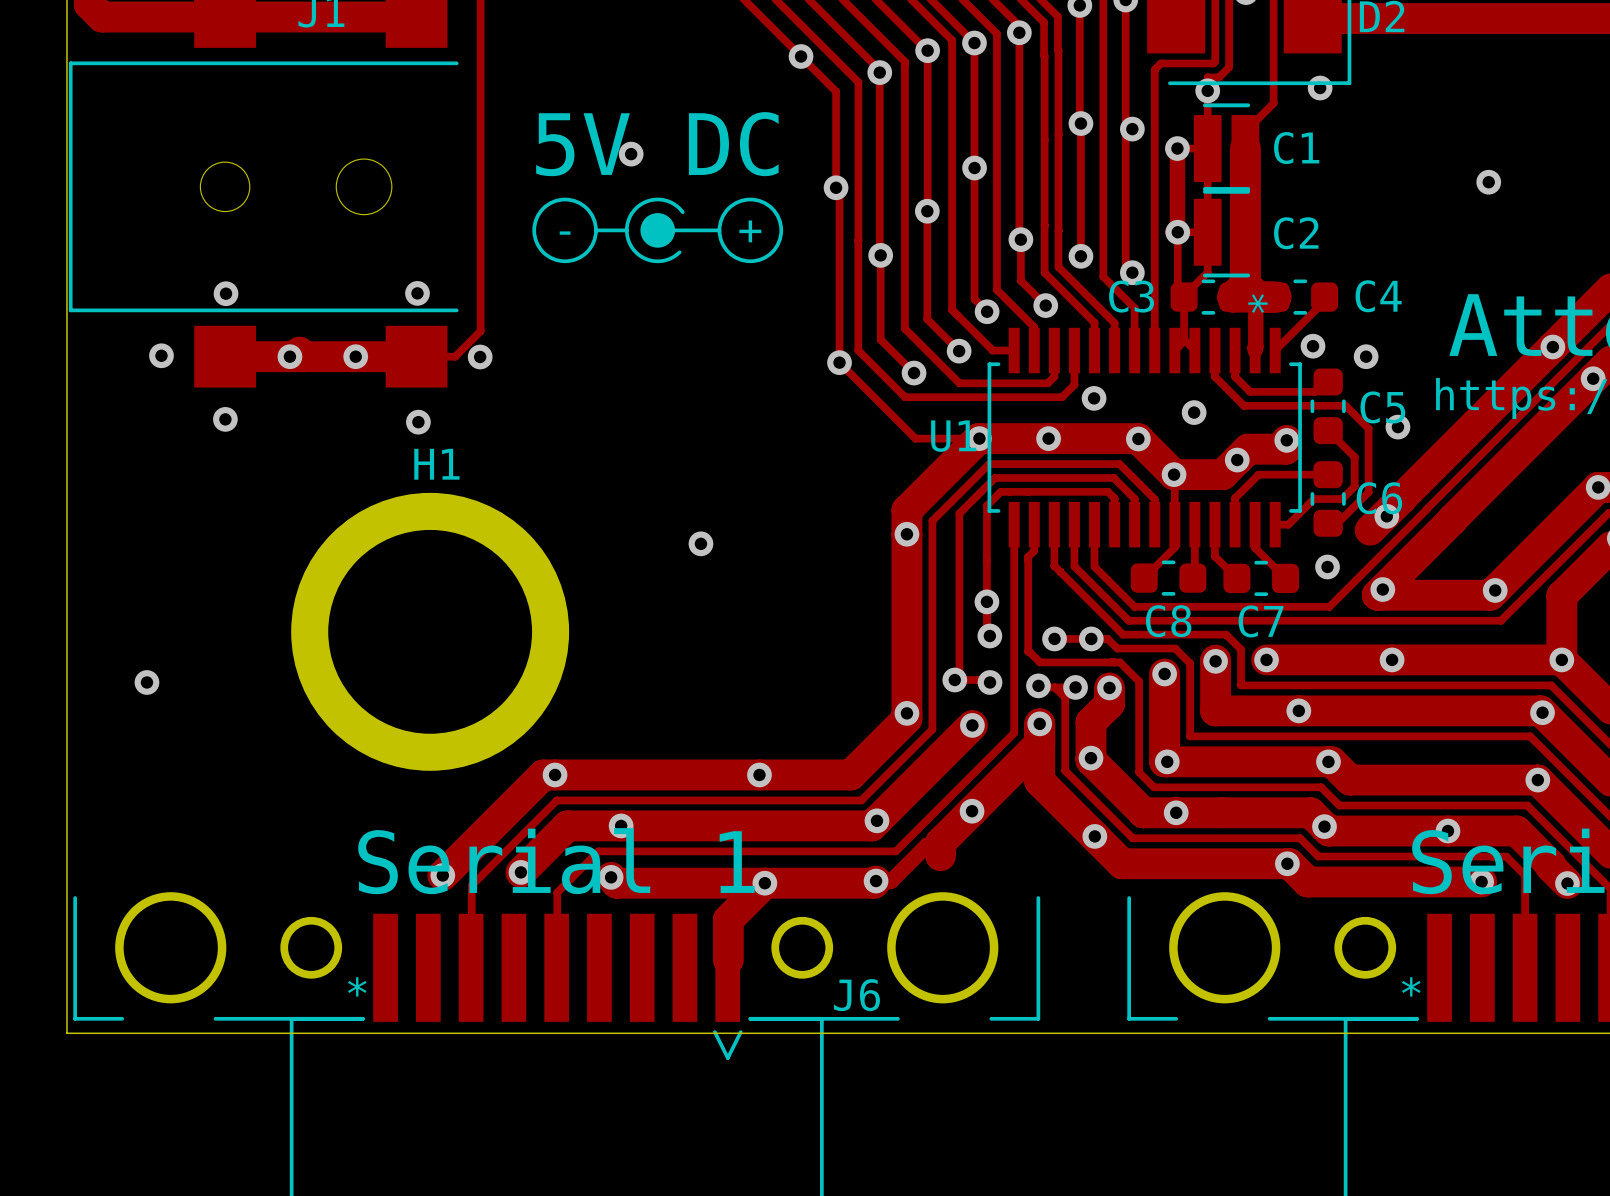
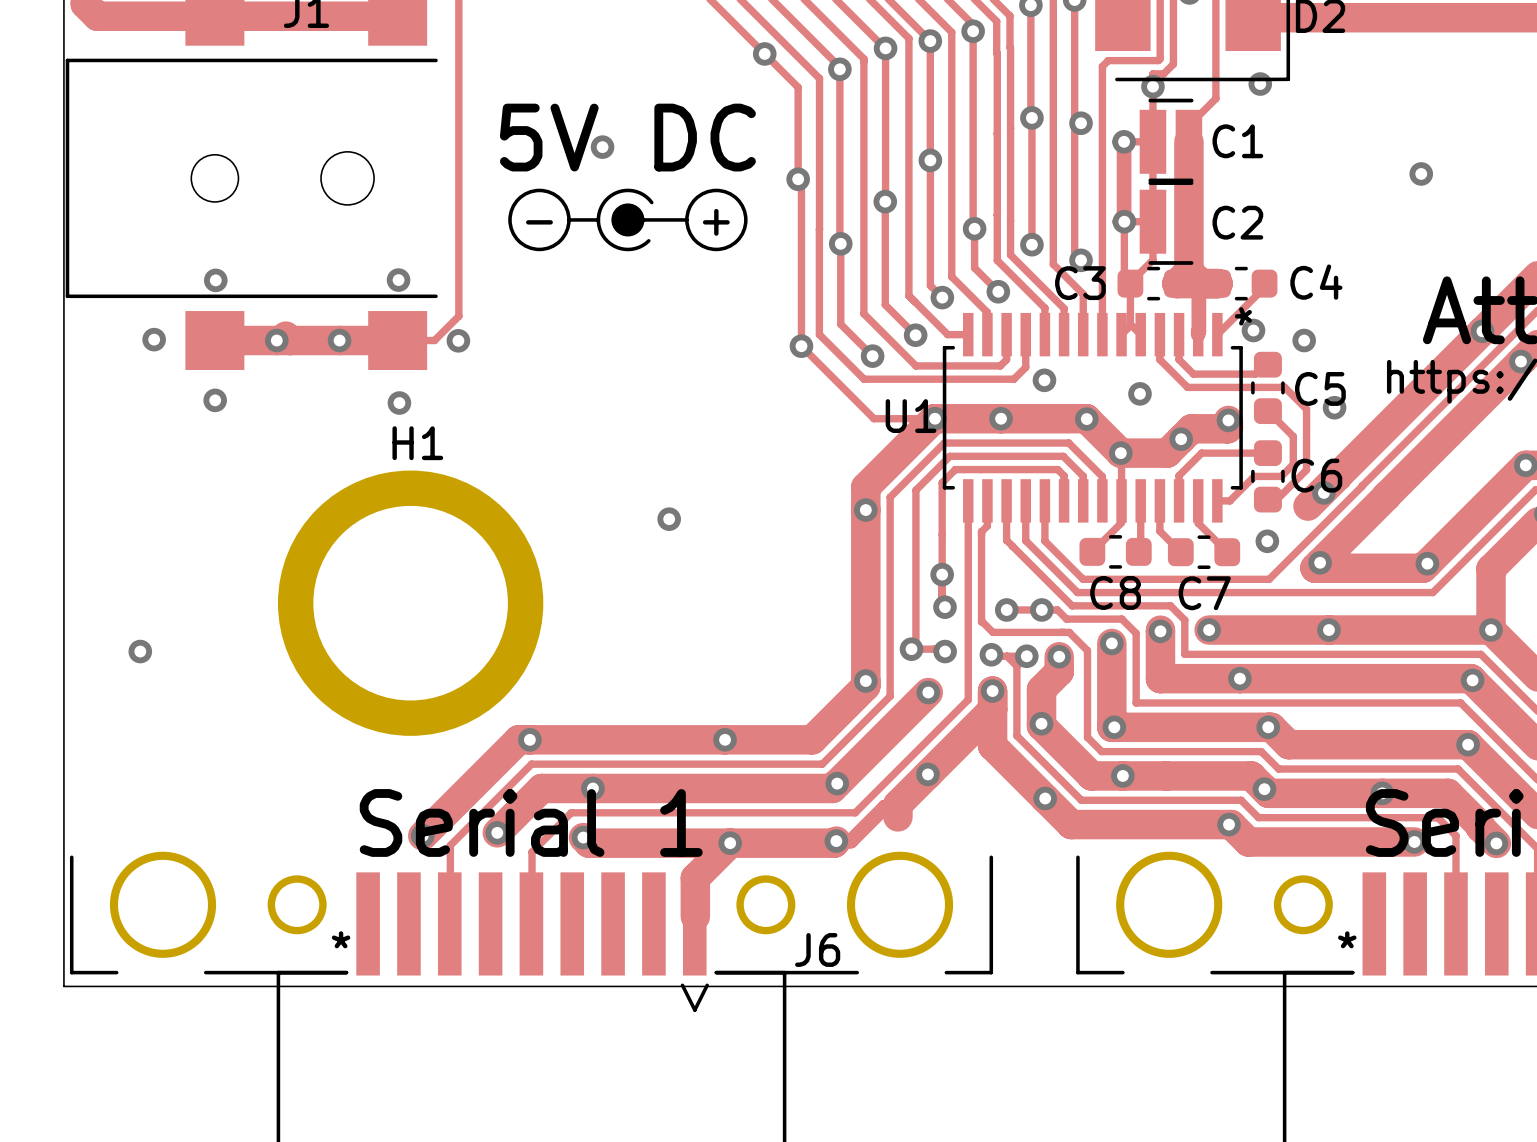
U1 text position: * (1257, 303) -> * (1243, 316)

